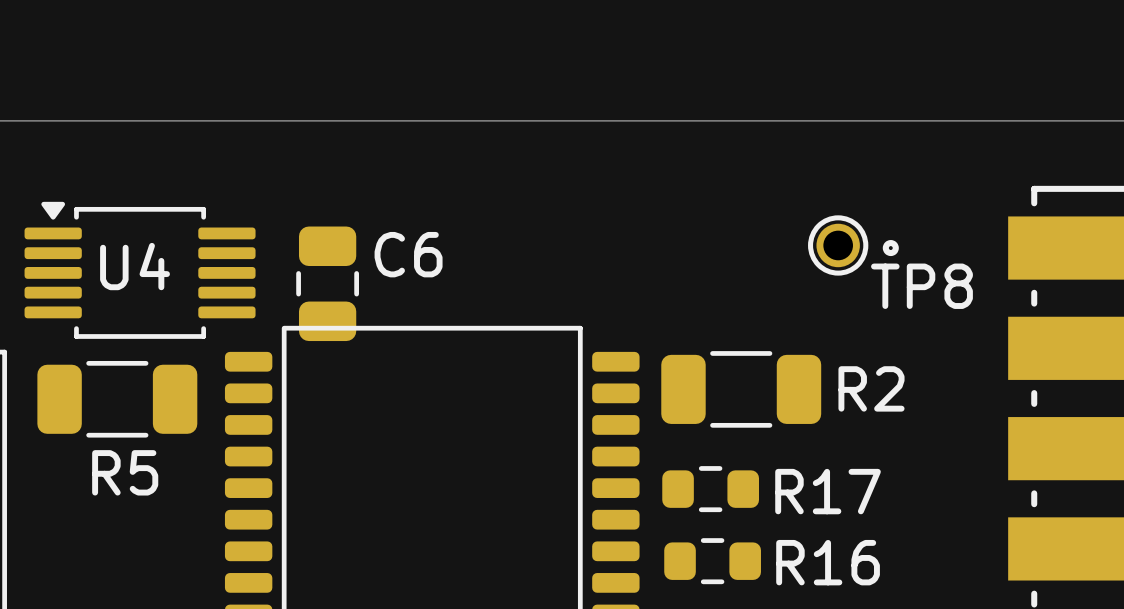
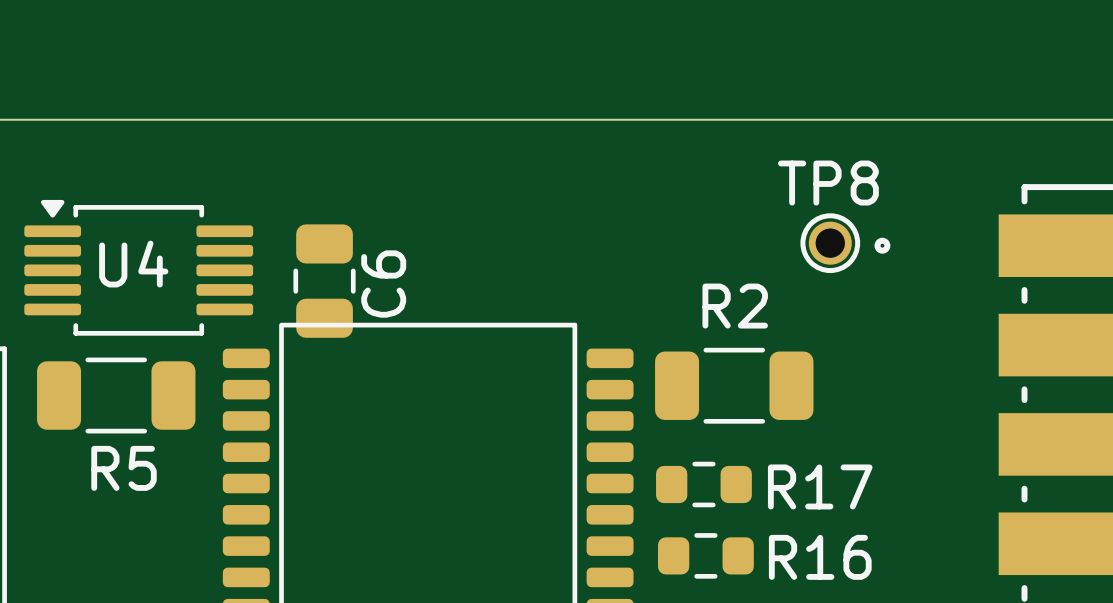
C6 name rotation: 0° (408, 254) -> 90° counterclockwise (383, 284)
TP8 name position: TP8 (921, 286) -> TP8 (828, 183)
R2 name position: R2 (871, 388) -> R2 (735, 306)

